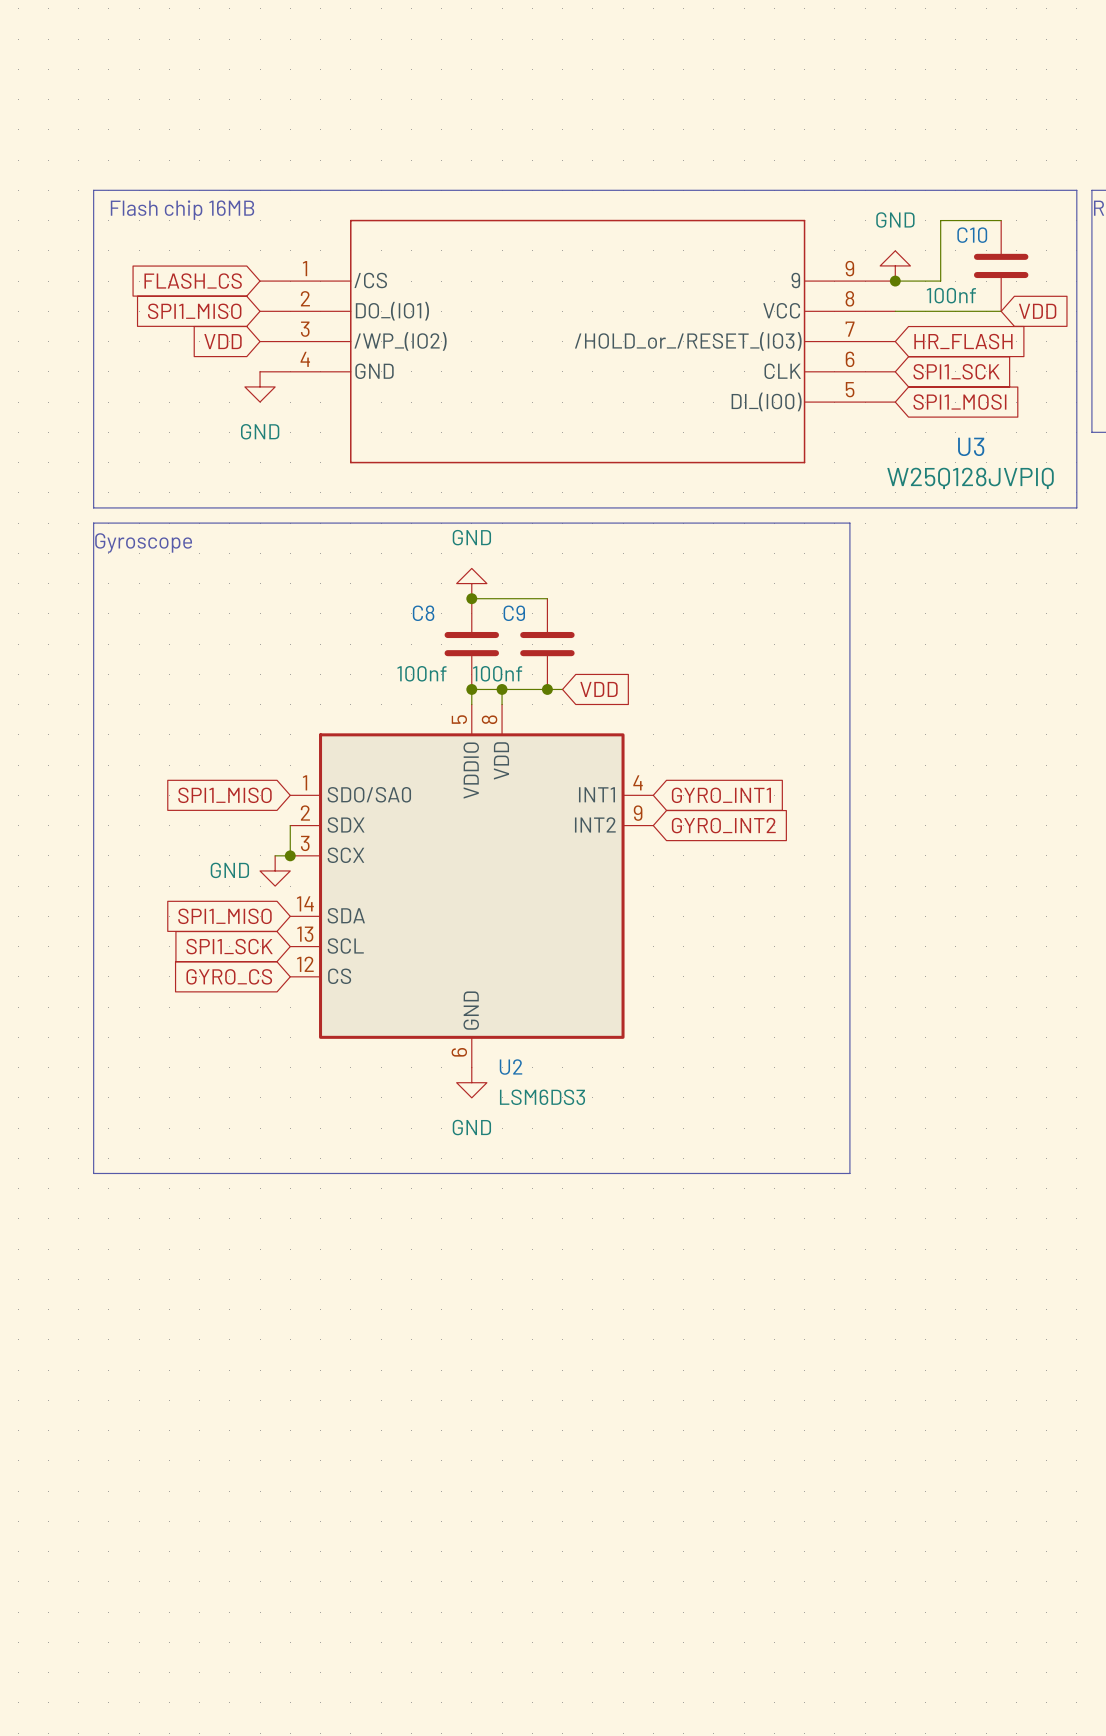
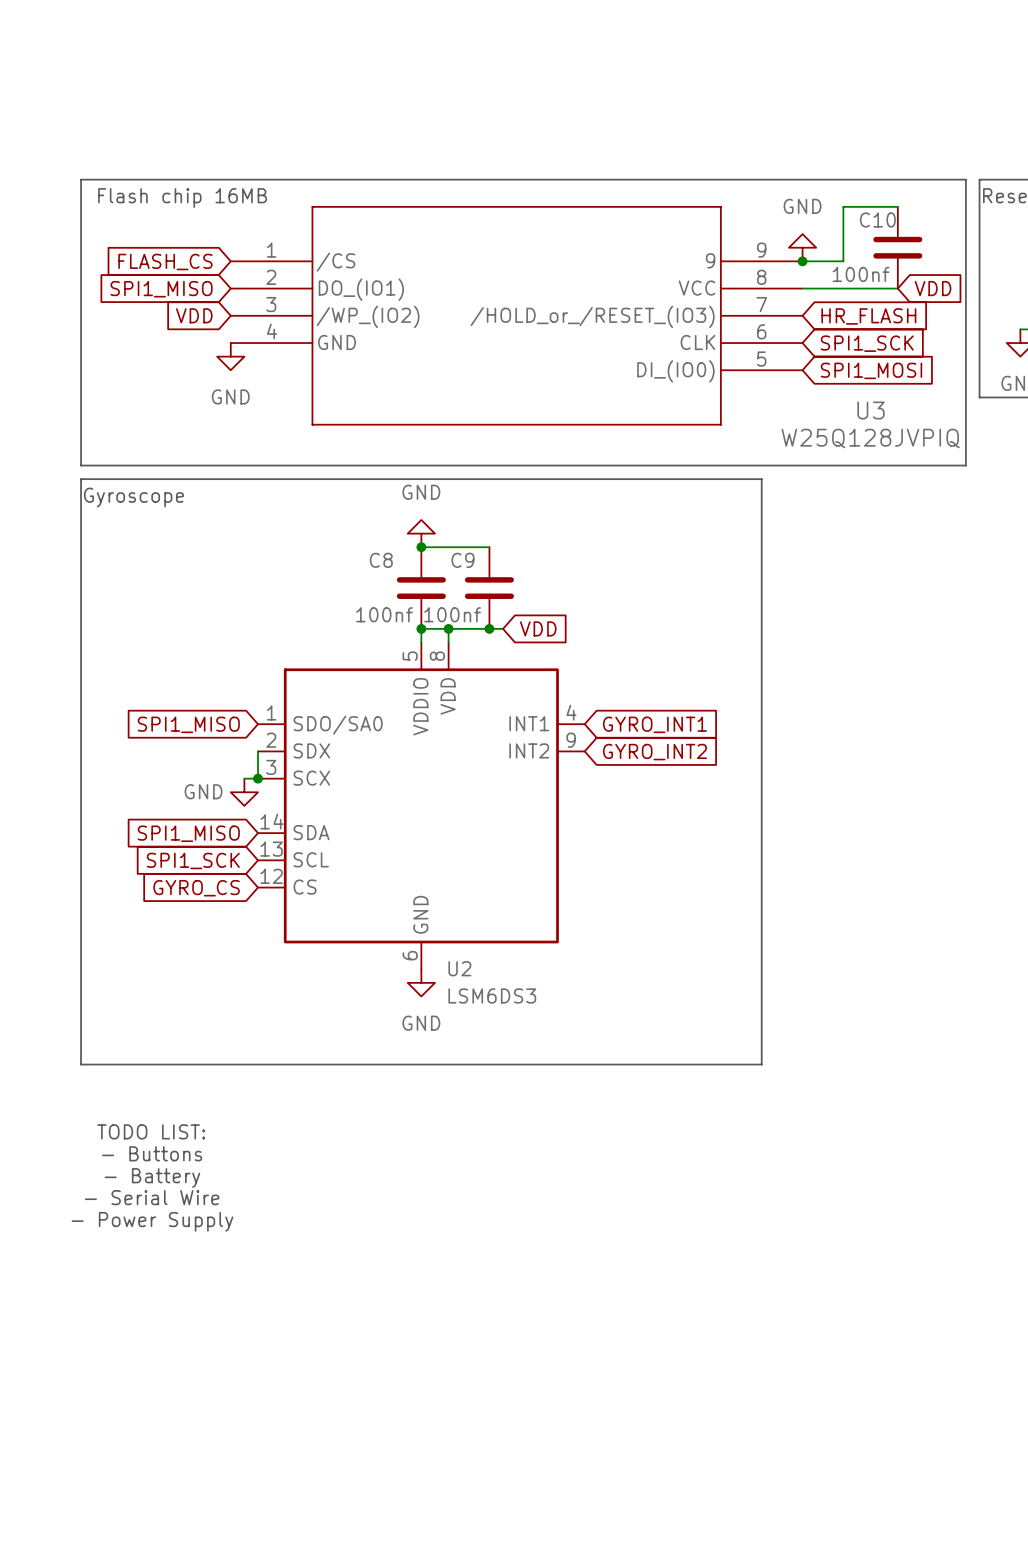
text: none -> TODO LIST: (151, 1131)
text: none -> - Buttons (152, 1153)
text: none -> - Battery (152, 1177)
text: none -> - Serial Wire (152, 1197)
text: none -> - Power Supply (152, 1221)

